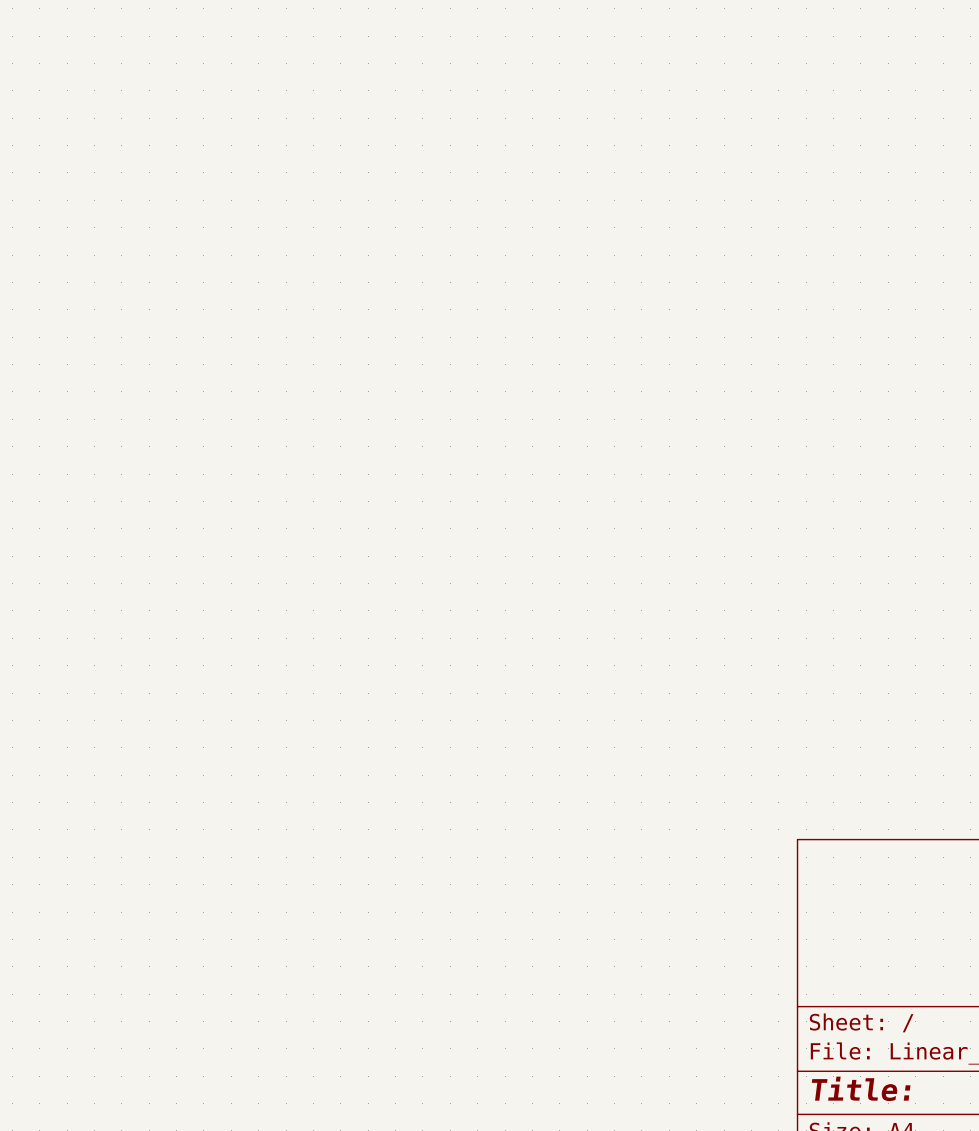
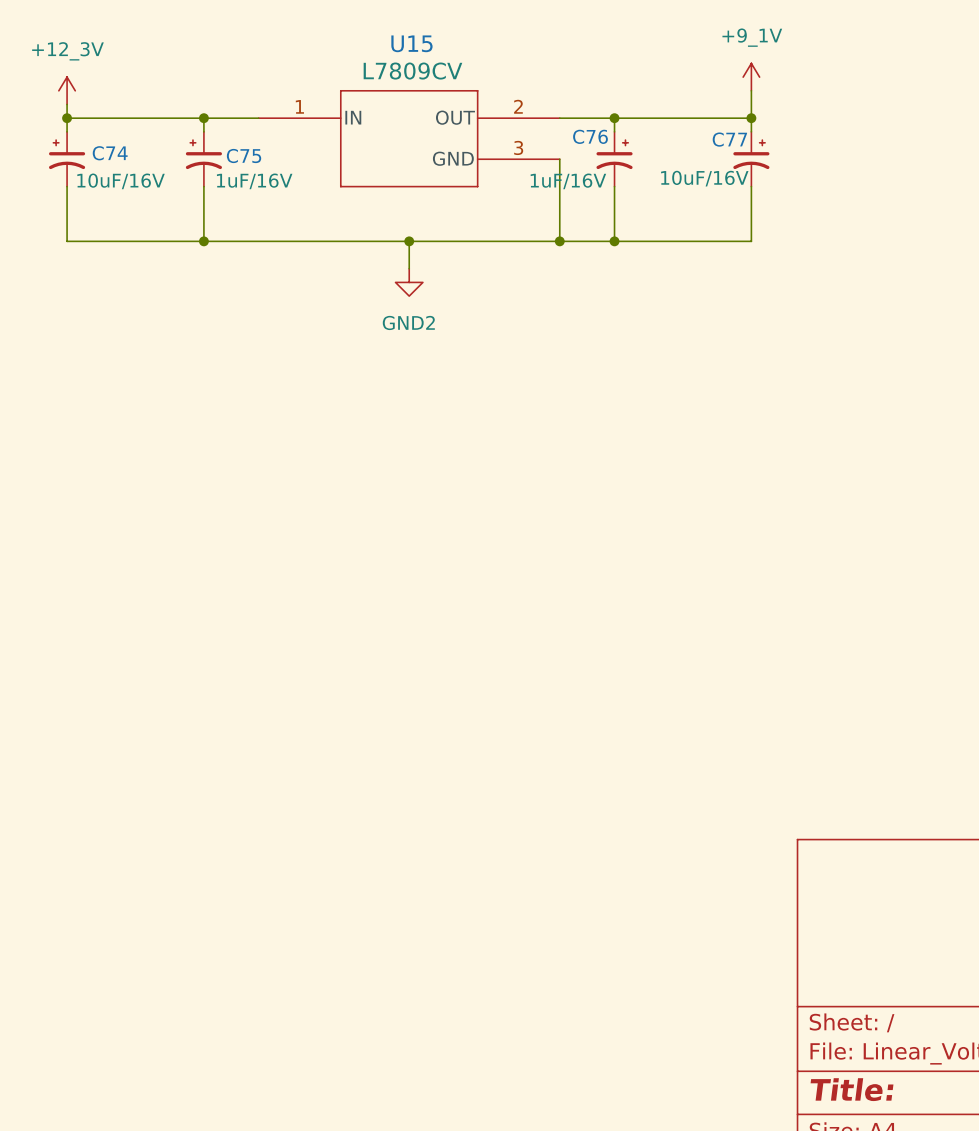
power symbol: none -> +9_1V (751, 77)
power symbol: none -> +12_3V (67, 90)
wire: none -> (751, 90) (751, 131)
wire: none -> (67, 104) (67, 131)
wire: none -> (67, 118) (258, 118)
junction: none -> (67, 118)
wire: none -> (203, 118) (203, 131)
junction: none -> (203, 118)
wire: none -> (559, 118) (751, 118)
wire: none -> (614, 118) (614, 131)
junction: none -> (614, 118)
junction: none -> (751, 118)
U15: none -> L7809CV (409, 138)
C74: none -> 10uF/16V (67, 159)
C75: none -> 1uF/16V (203, 159)
wire: none -> (559, 159) (559, 241)
C76: none -> 1uF/16V (614, 159)
C77: none -> 10uF/16V (751, 159)
wire: none -> (67, 186) (67, 241) (751, 241) (751, 186)
wire: none -> (203, 186) (203, 241)
wire: none -> (614, 186) (614, 241)
junction: none -> (203, 241)
wire: none -> (409, 241) (409, 268)
junction: none -> (409, 241)
junction: none -> (559, 241)
junction: none -> (614, 241)
power symbol: none -> GND2 (409, 282)

